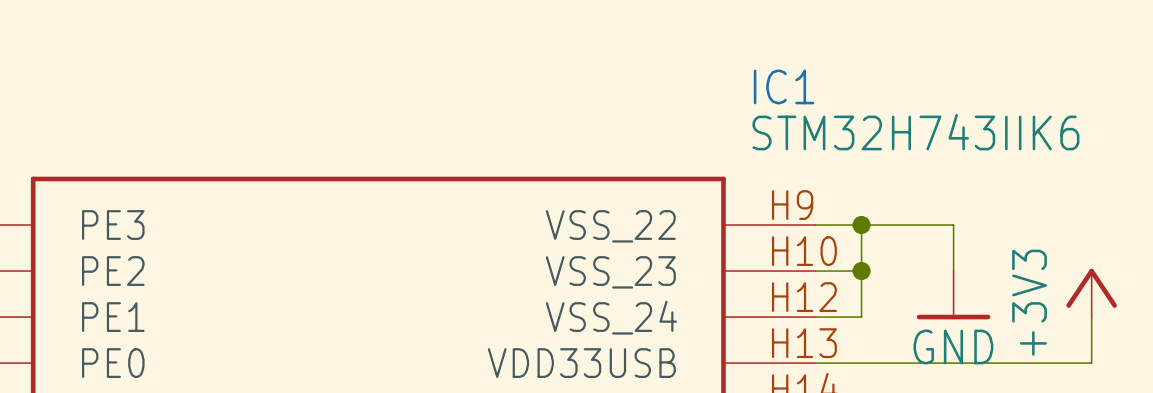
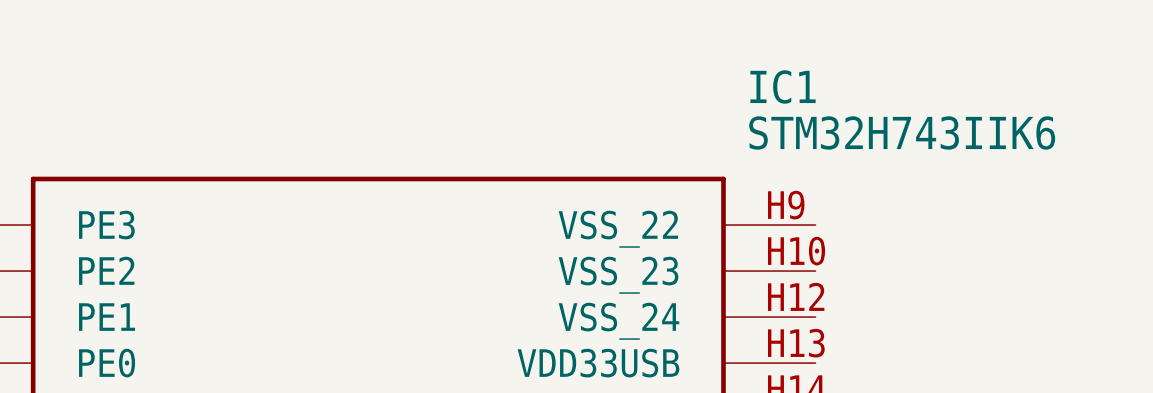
wire: (815, 225) (953, 225) (953, 271) -> none
wire: (861, 225) (861, 317) (815, 317) -> none
junction: (861, 225) -> none
wire: (815, 271) (861, 271) -> none
junction: (861, 271) -> none
power symbol: +3V3 (1091, 292) -> none
power symbol: GND (953, 295) -> none
wire: (1091, 317) (1091, 363) (815, 363) -> none

